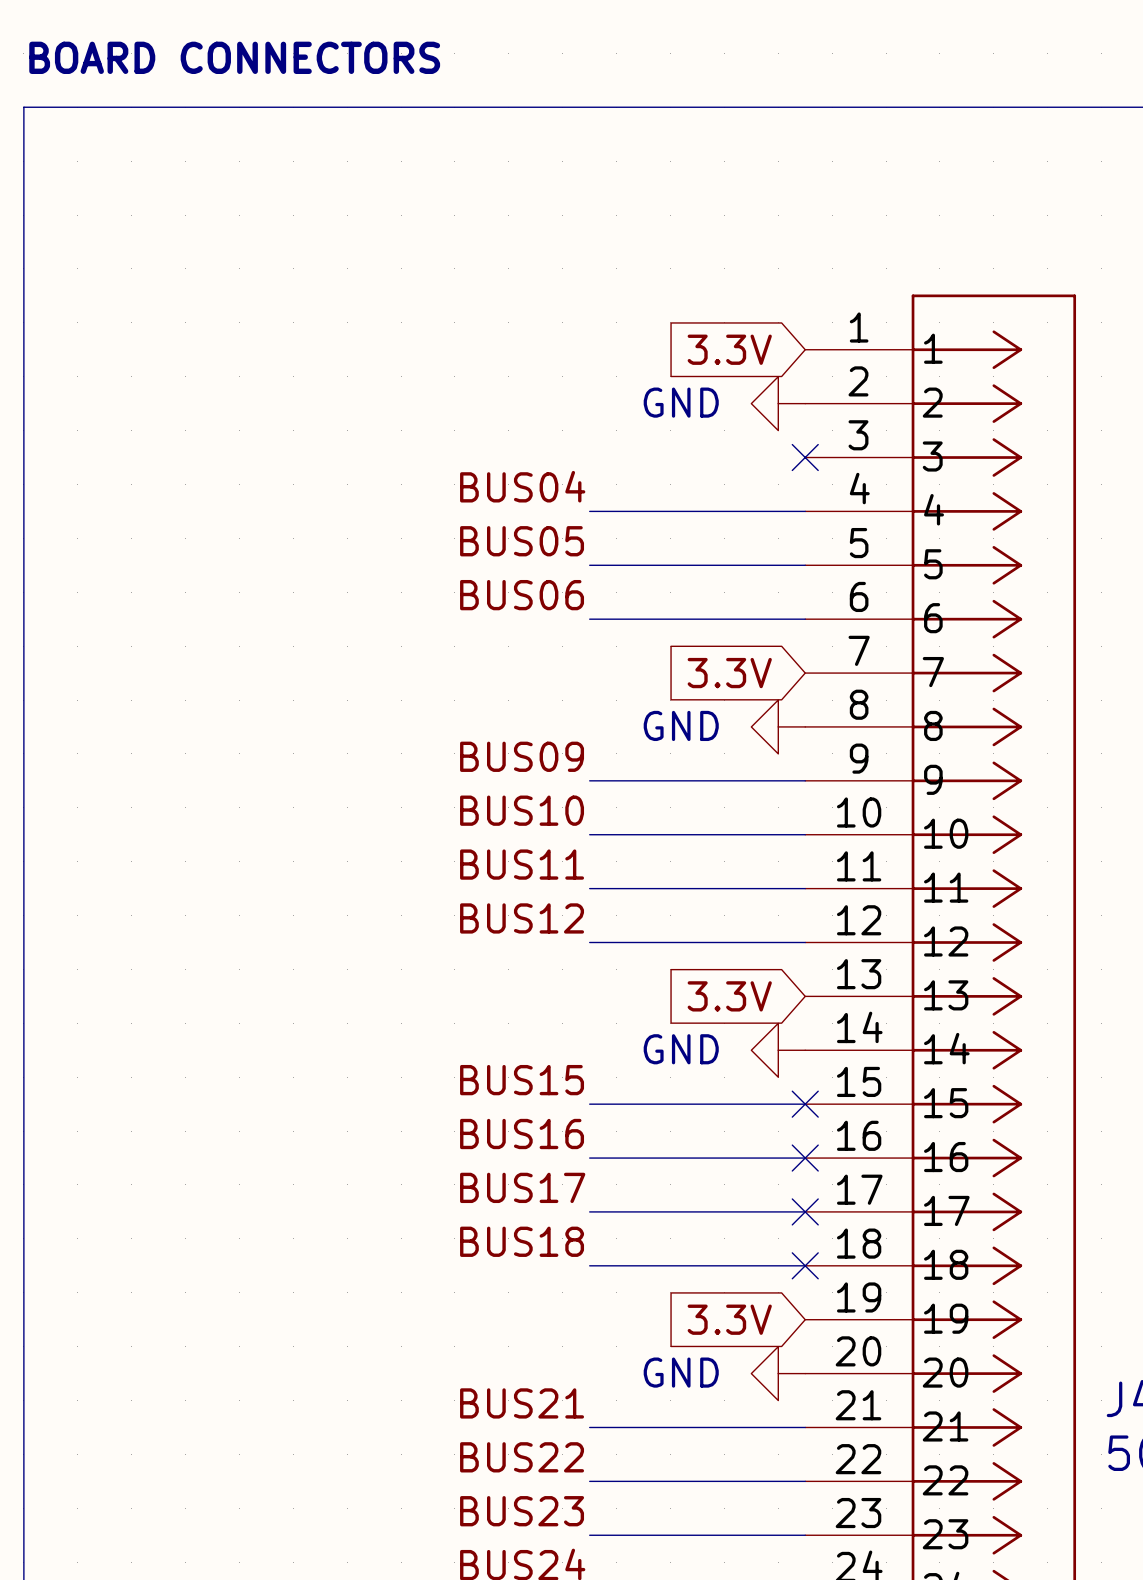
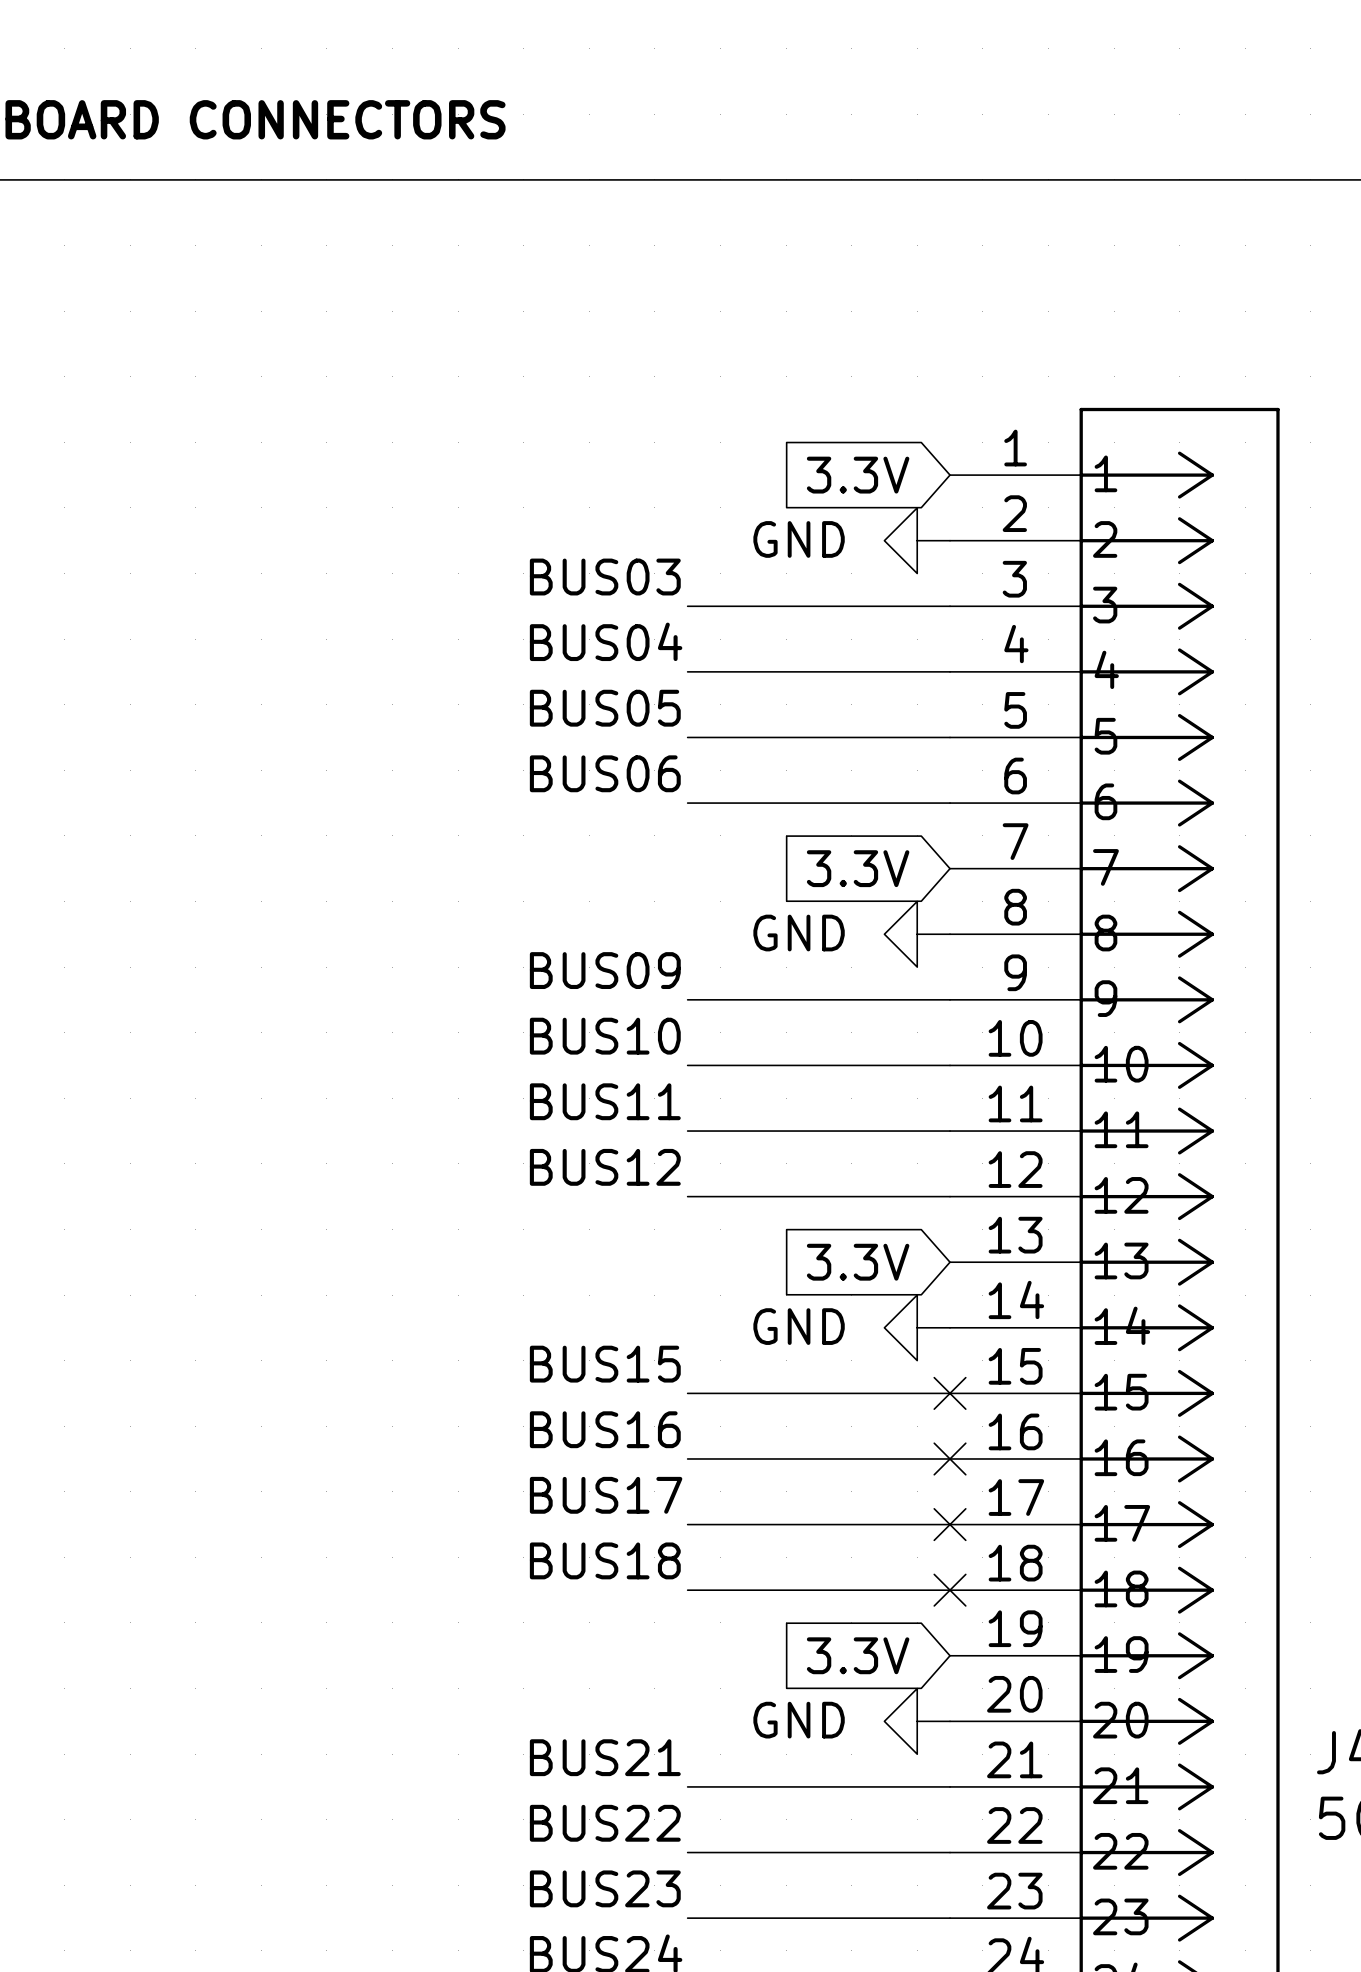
label: none -> BUS03 (605, 577)
wire: none -> (687, 606) (950, 606)
no-connect mark: (805, 457) -> none

